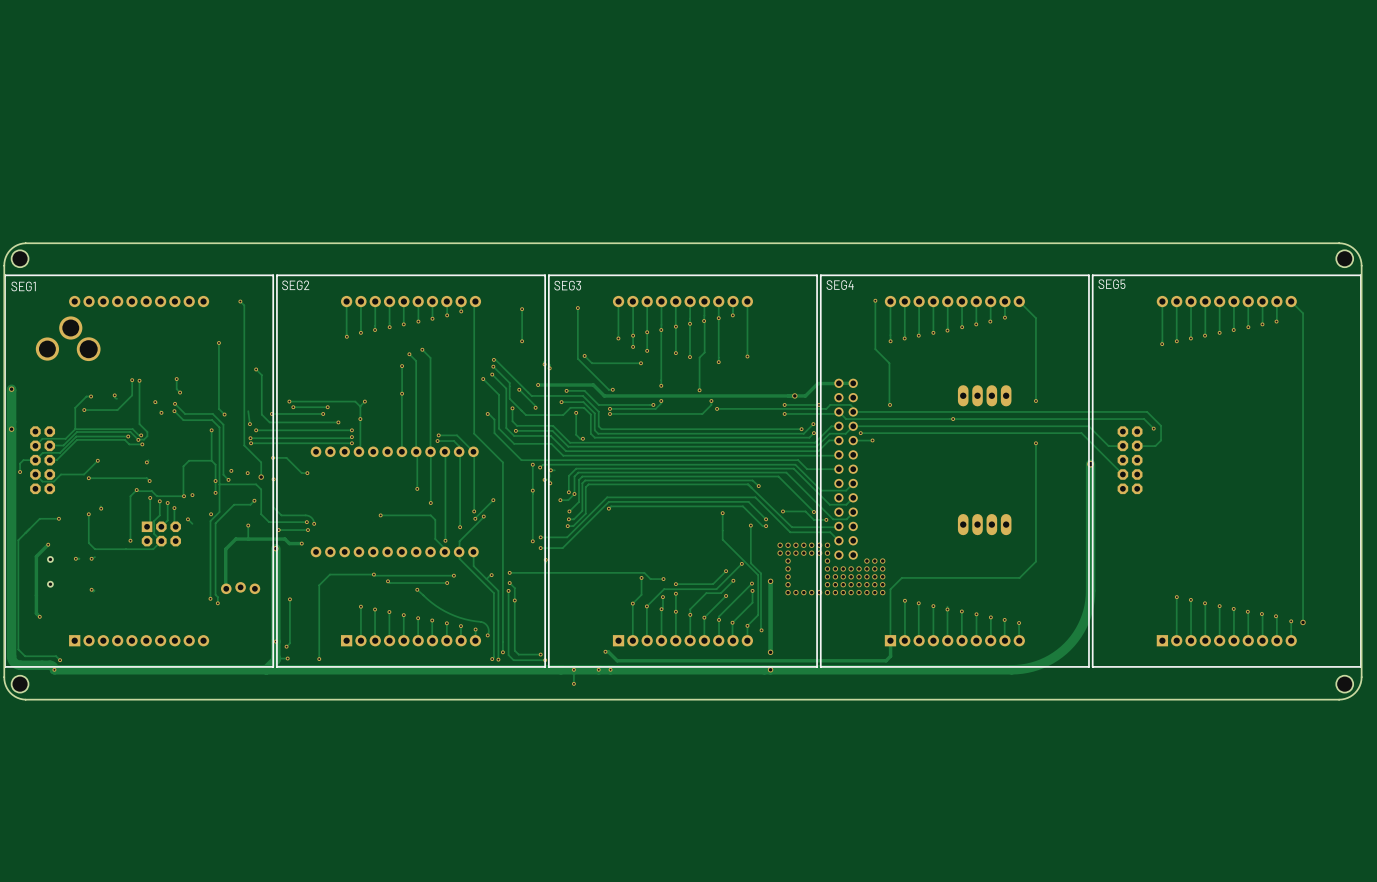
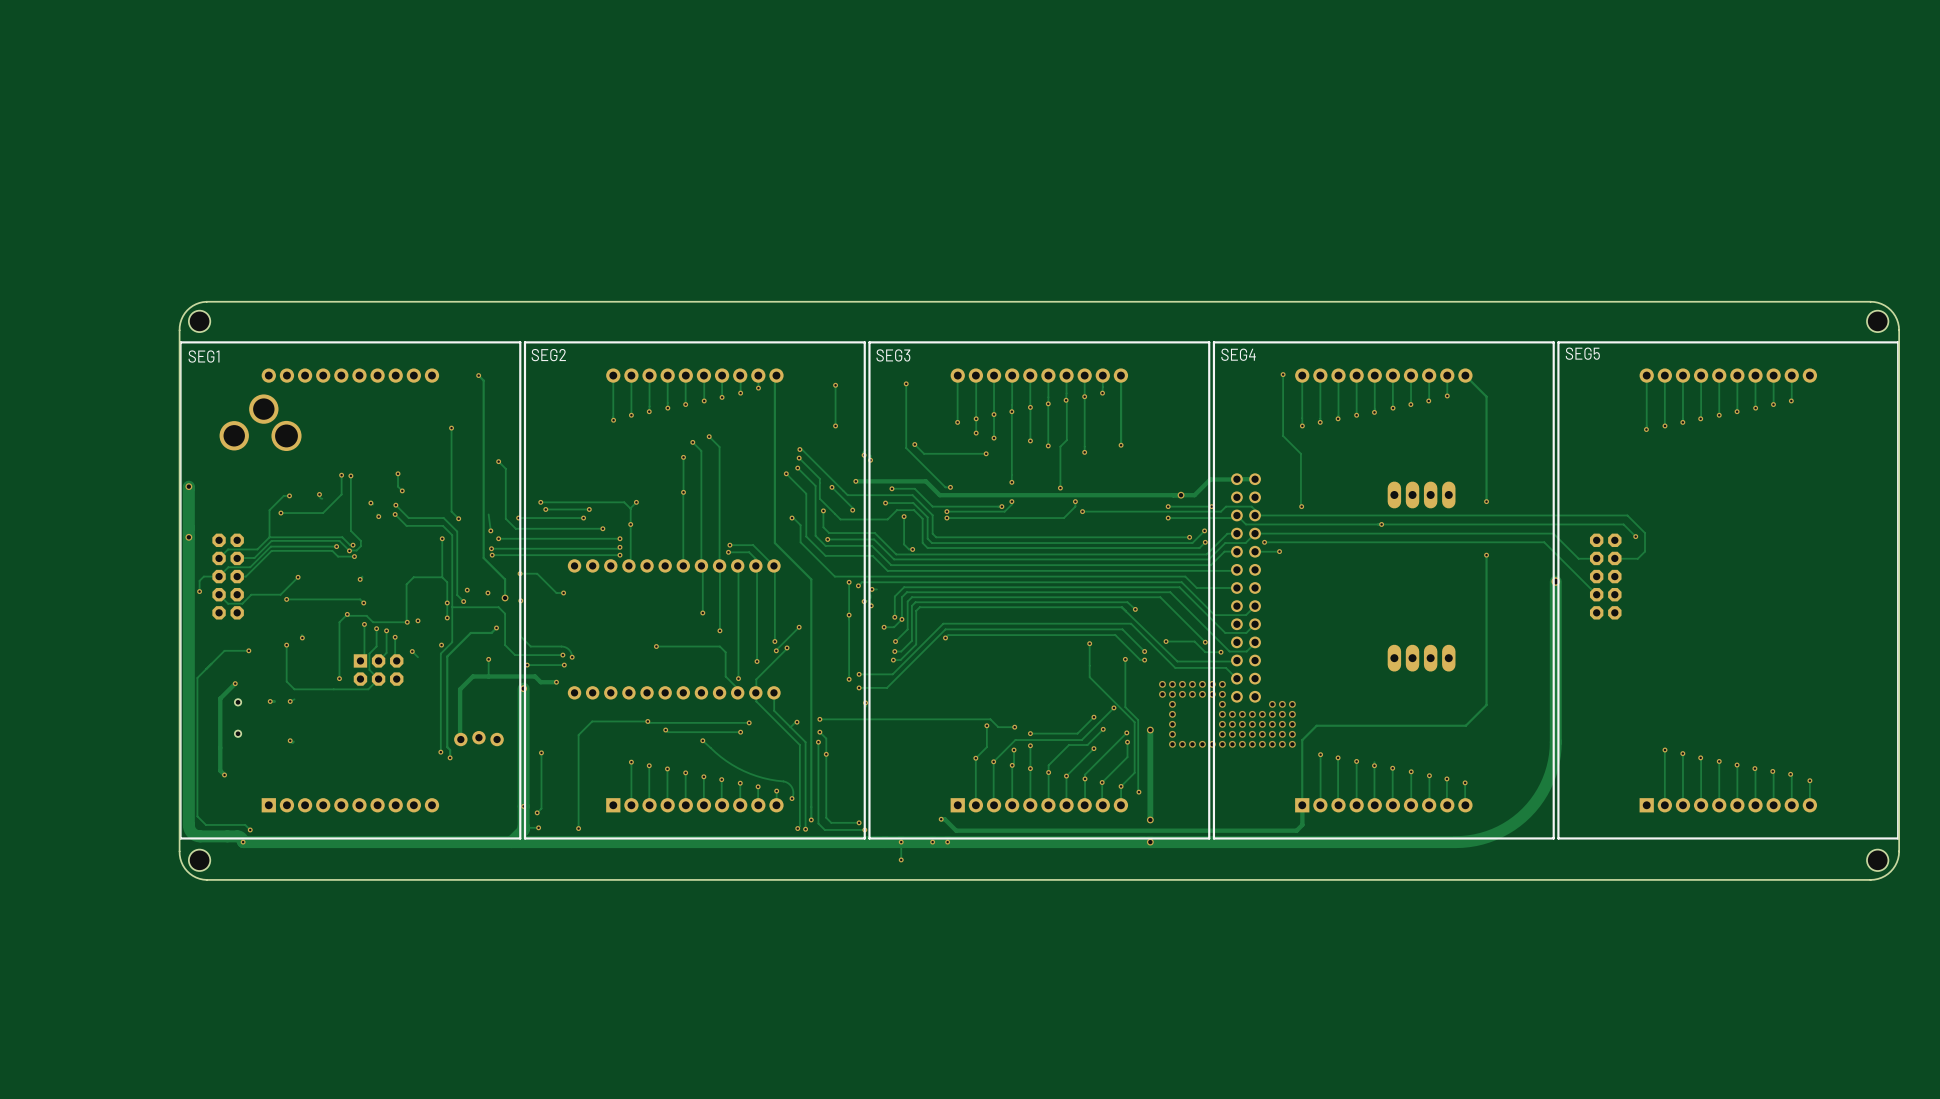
track: (1291, 301) (1303, 313) (1303, 622) -> none
via: (1303, 622) -> none

